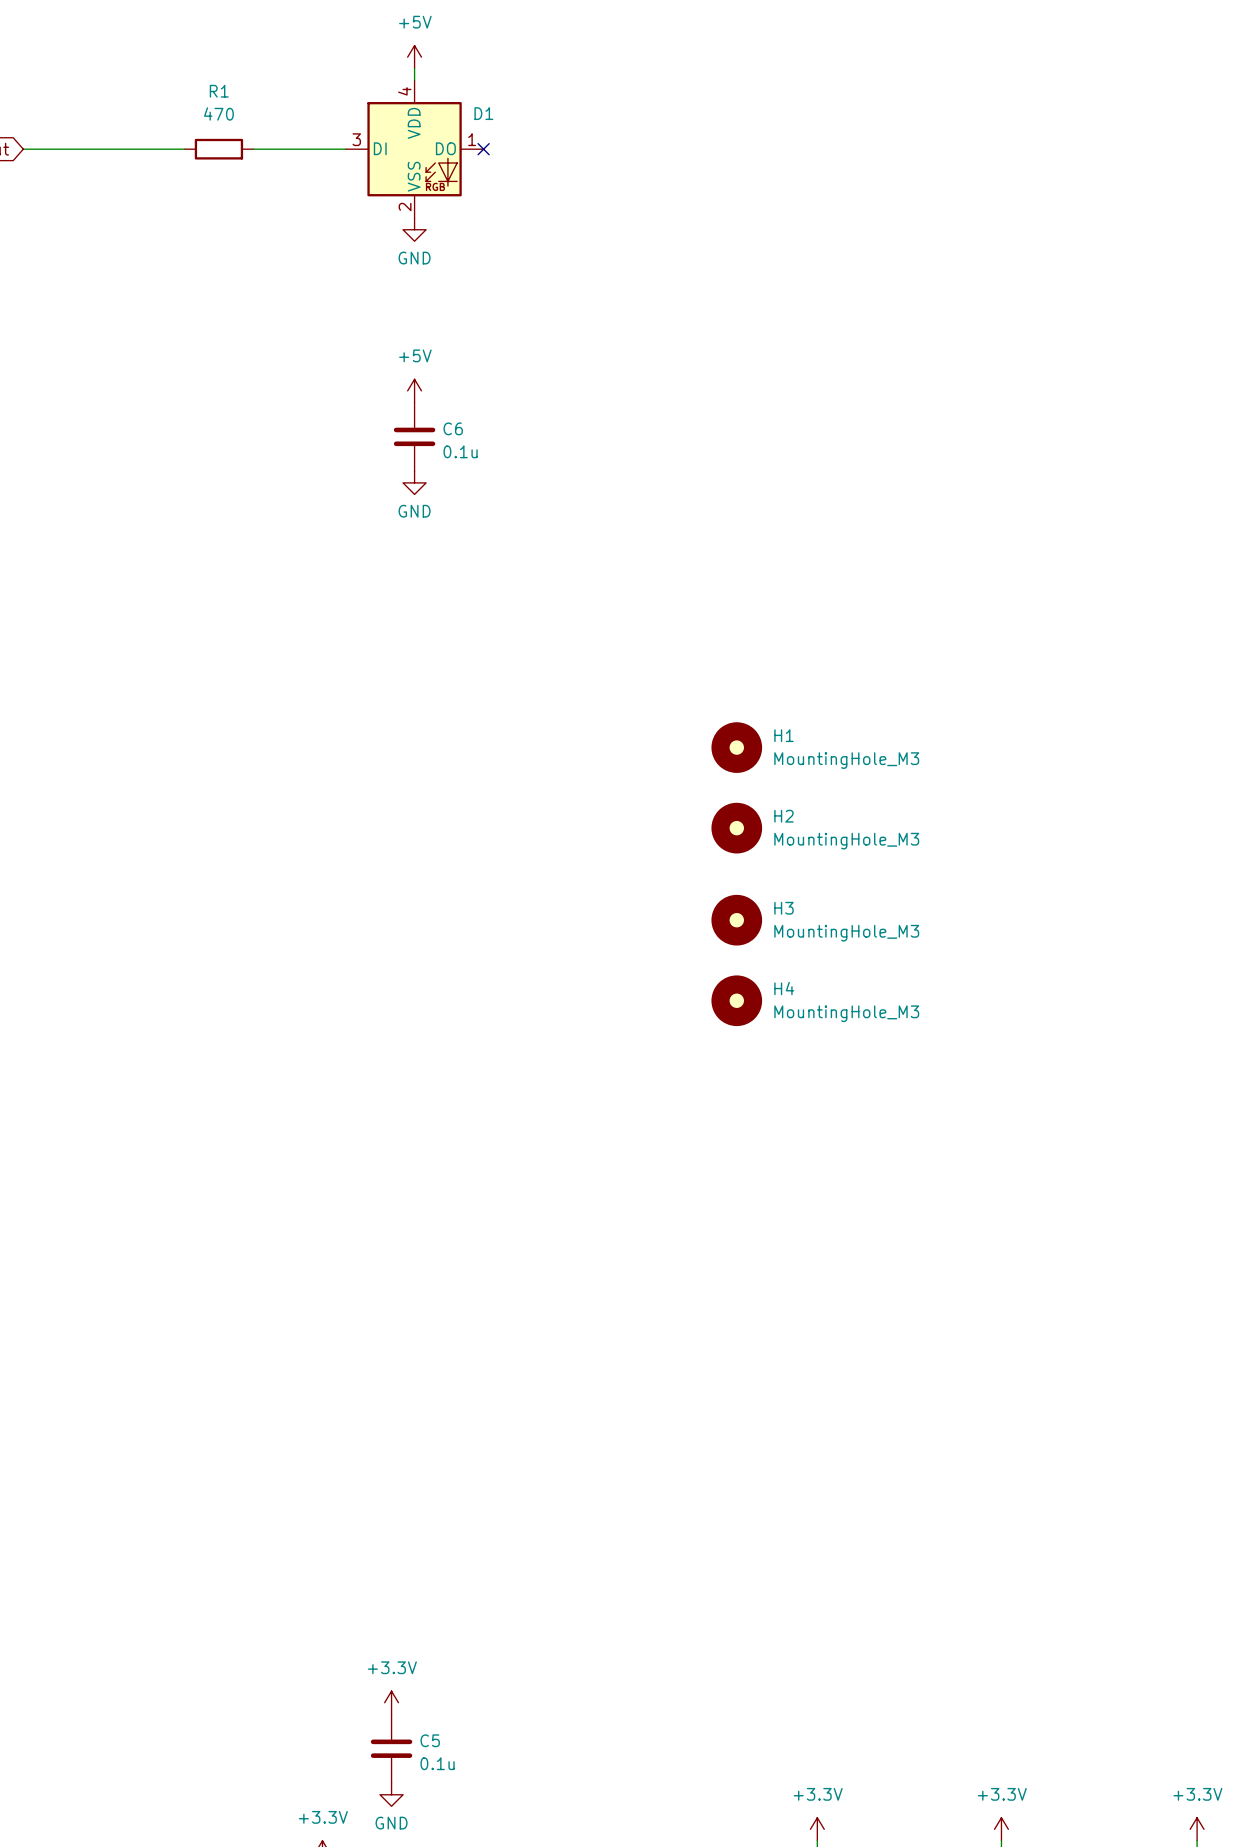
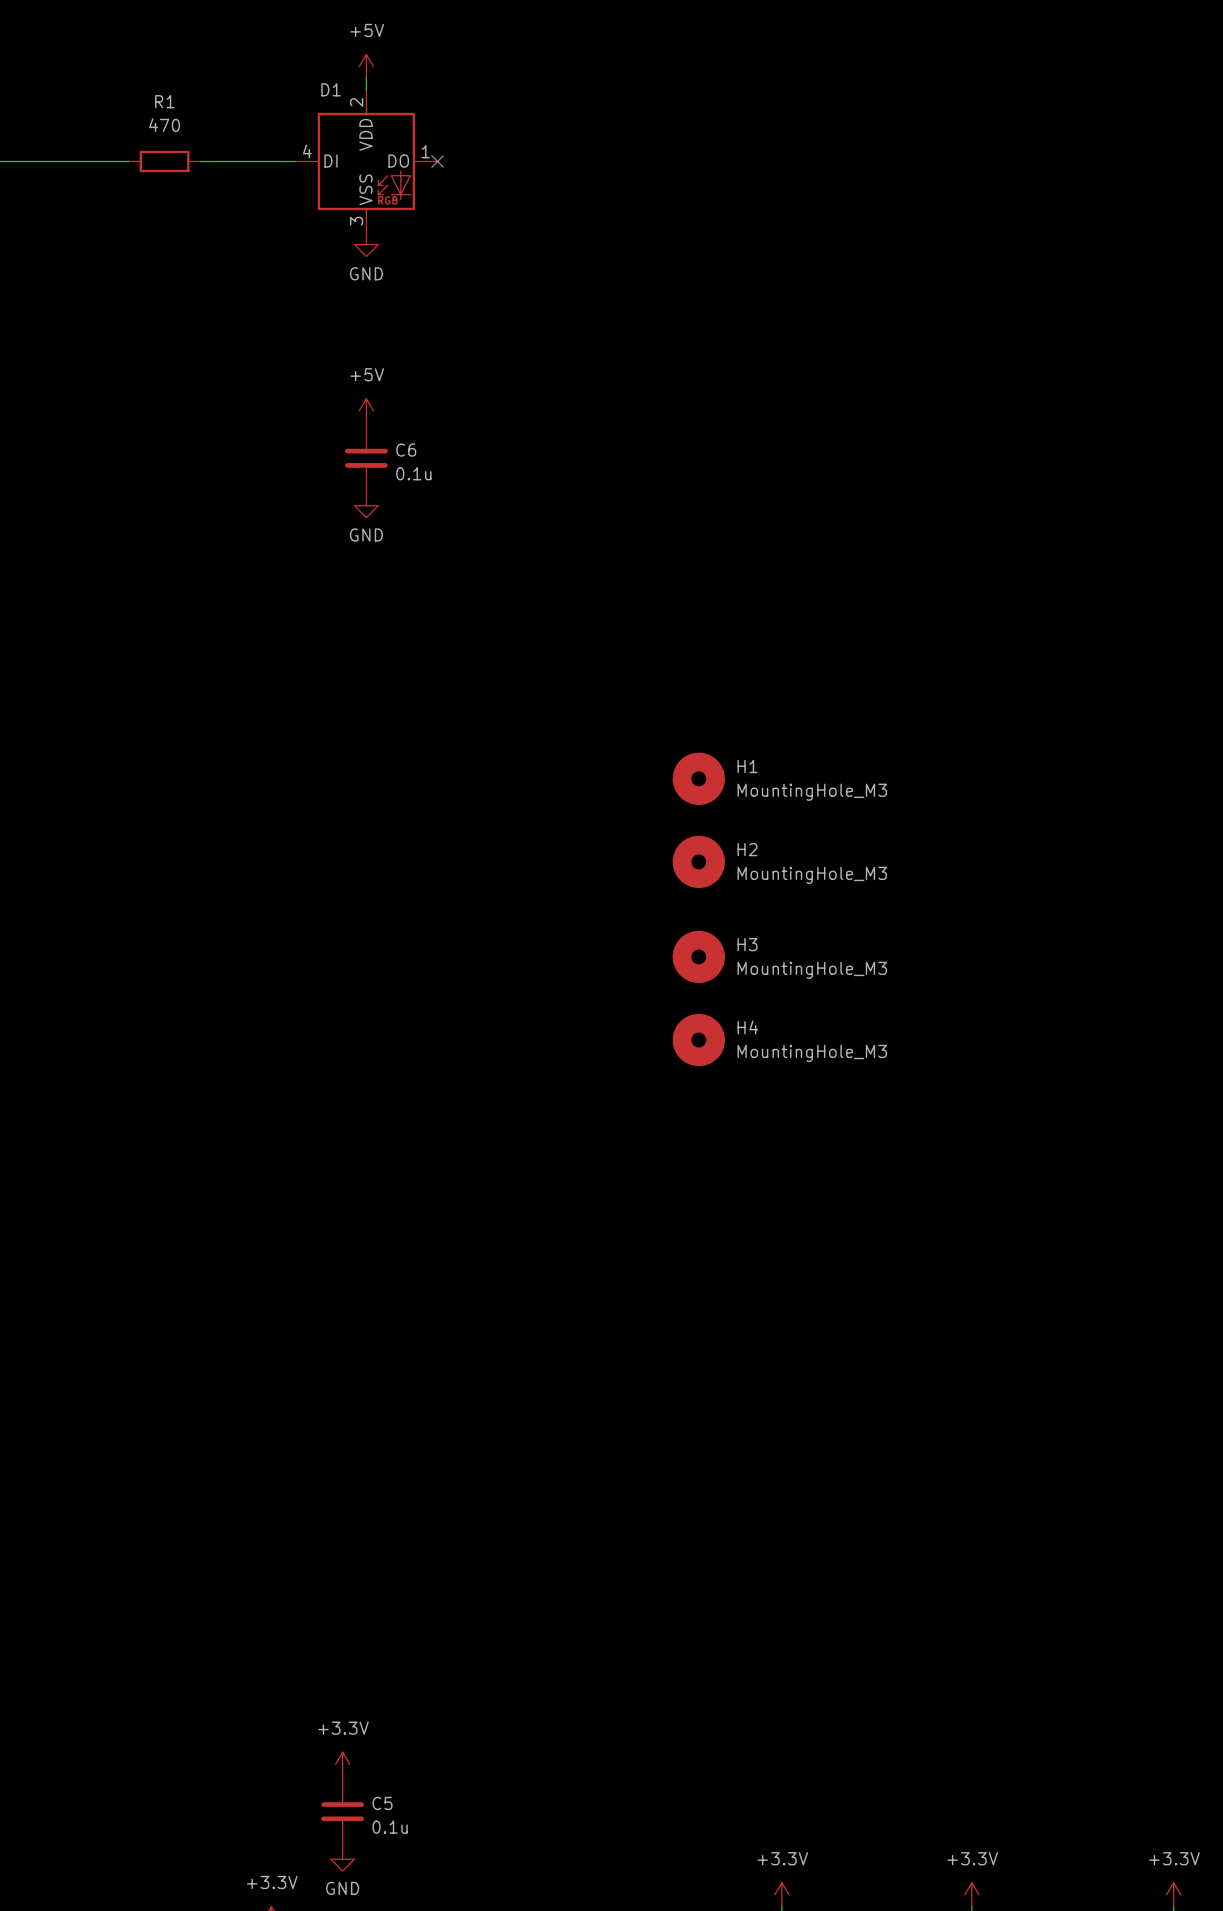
D1 pin number: 4 (404, 91) -> 2 (356, 102)
D1 name position: D1 (483, 113) -> D1 (331, 89)
D1 pin number: 3 (356, 139) -> 4 (307, 151)
D1 pin number: 2 (405, 207) -> 3 (356, 221)

